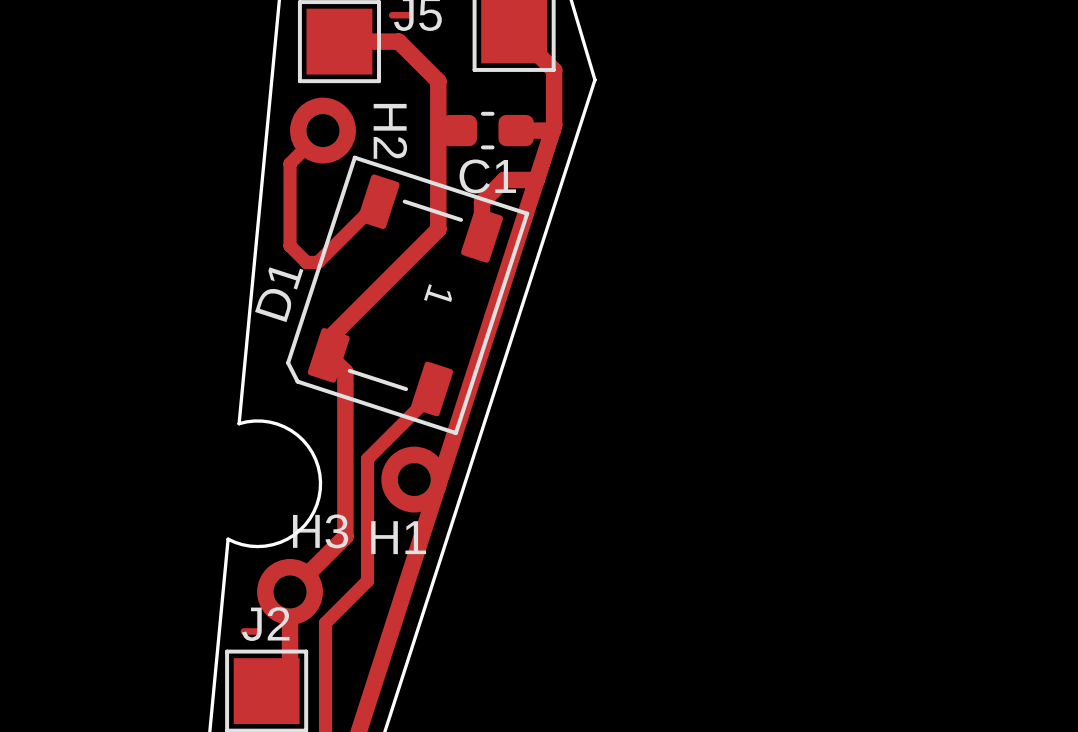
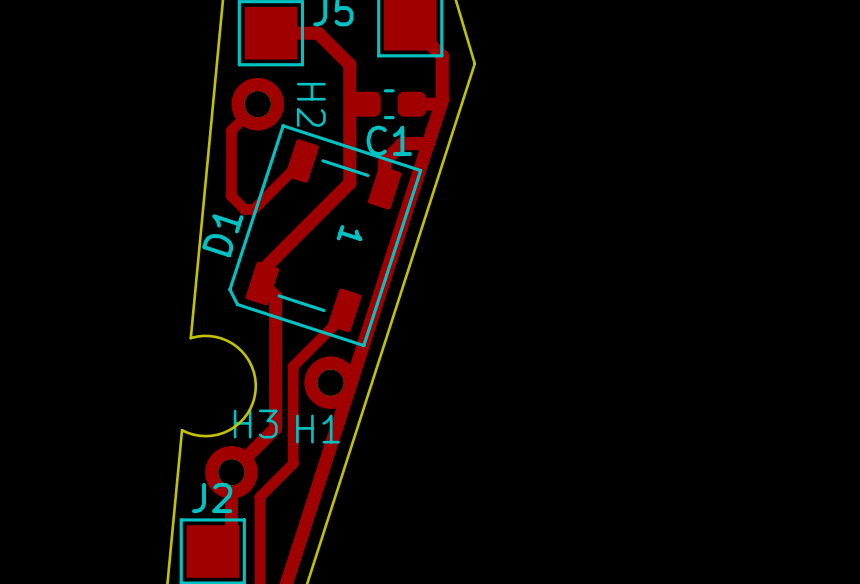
top track: (392, 15) (408, 15) -> none
top track: (243, 631) (257, 631) -> none

